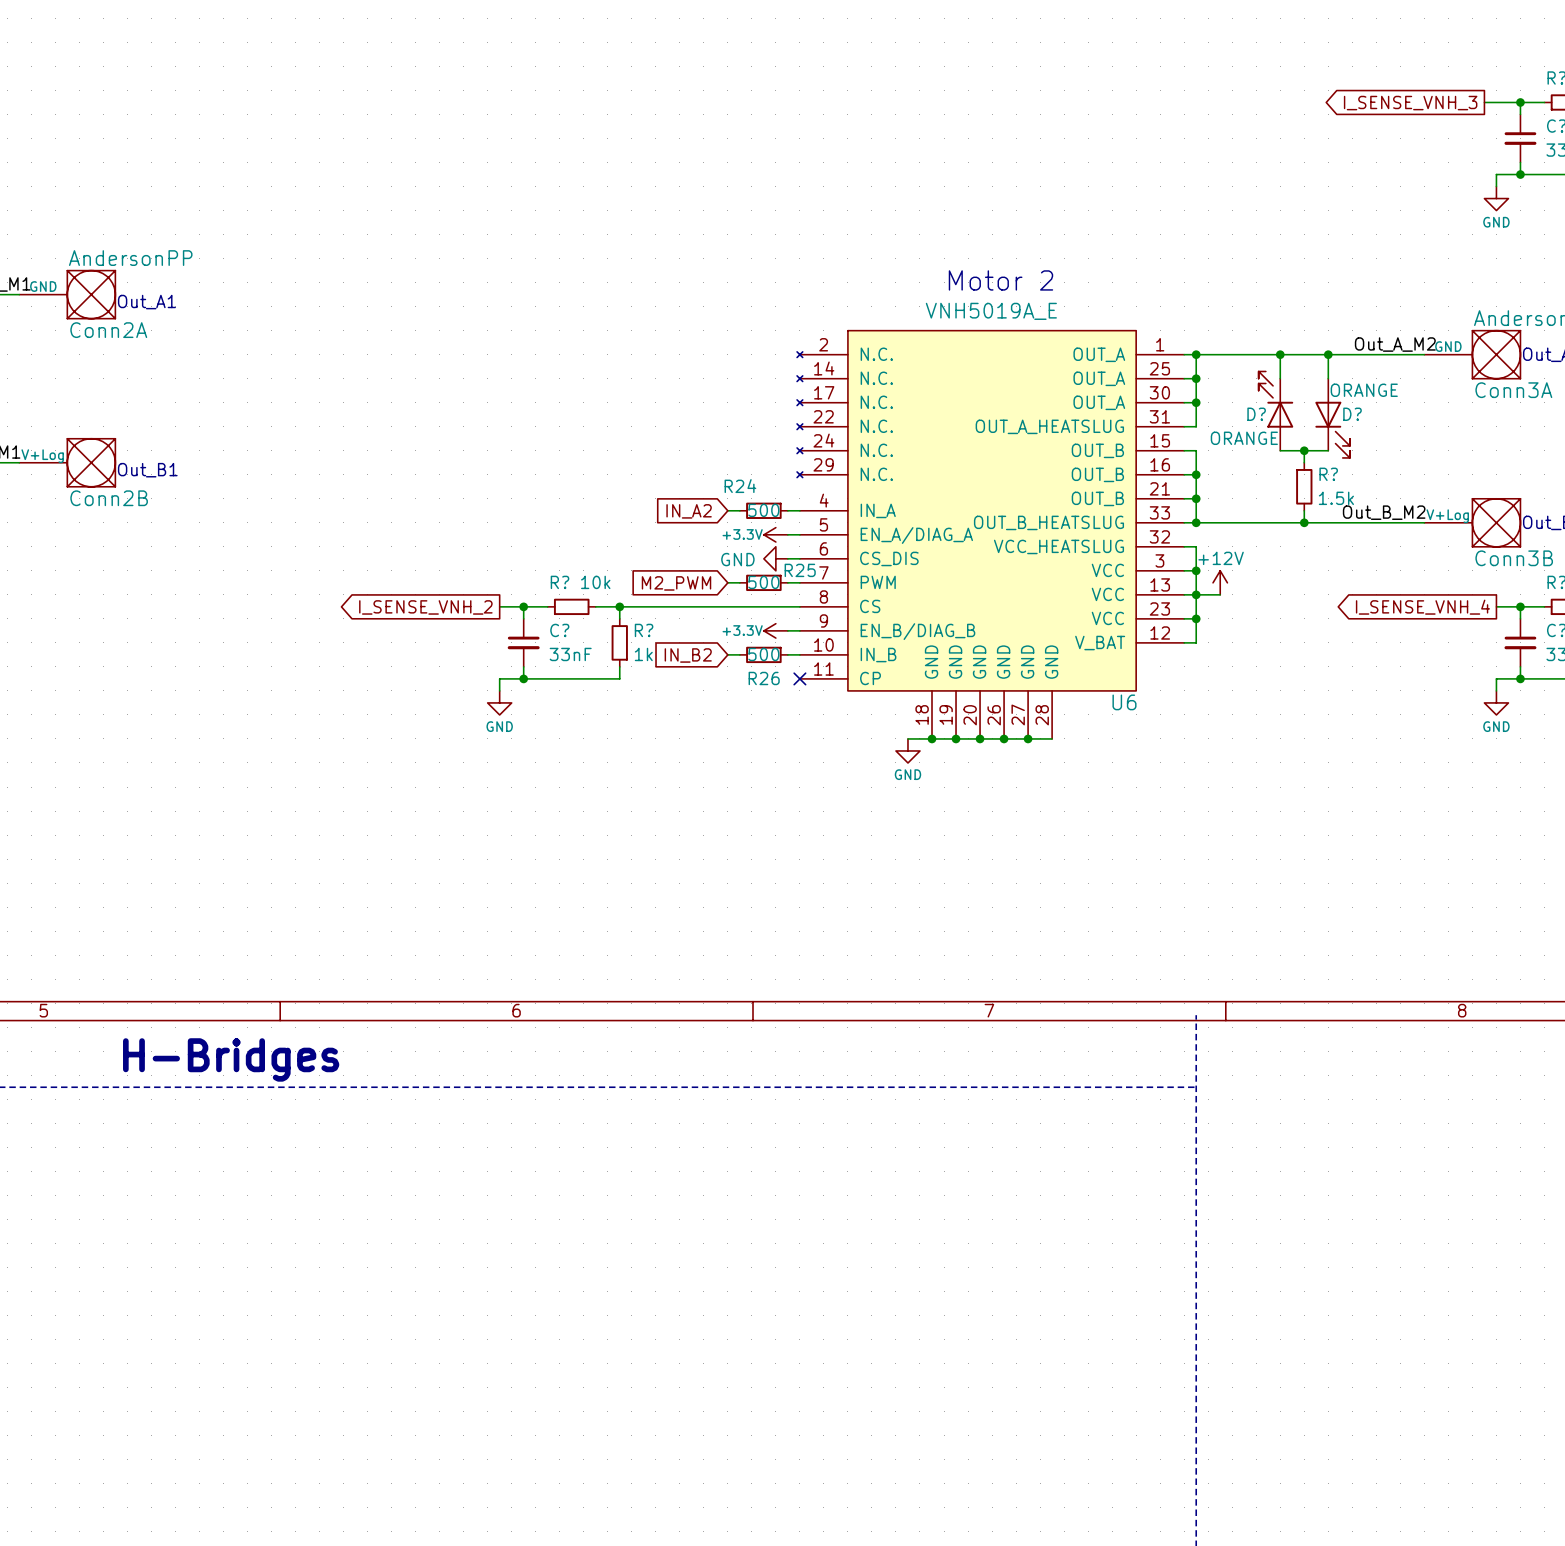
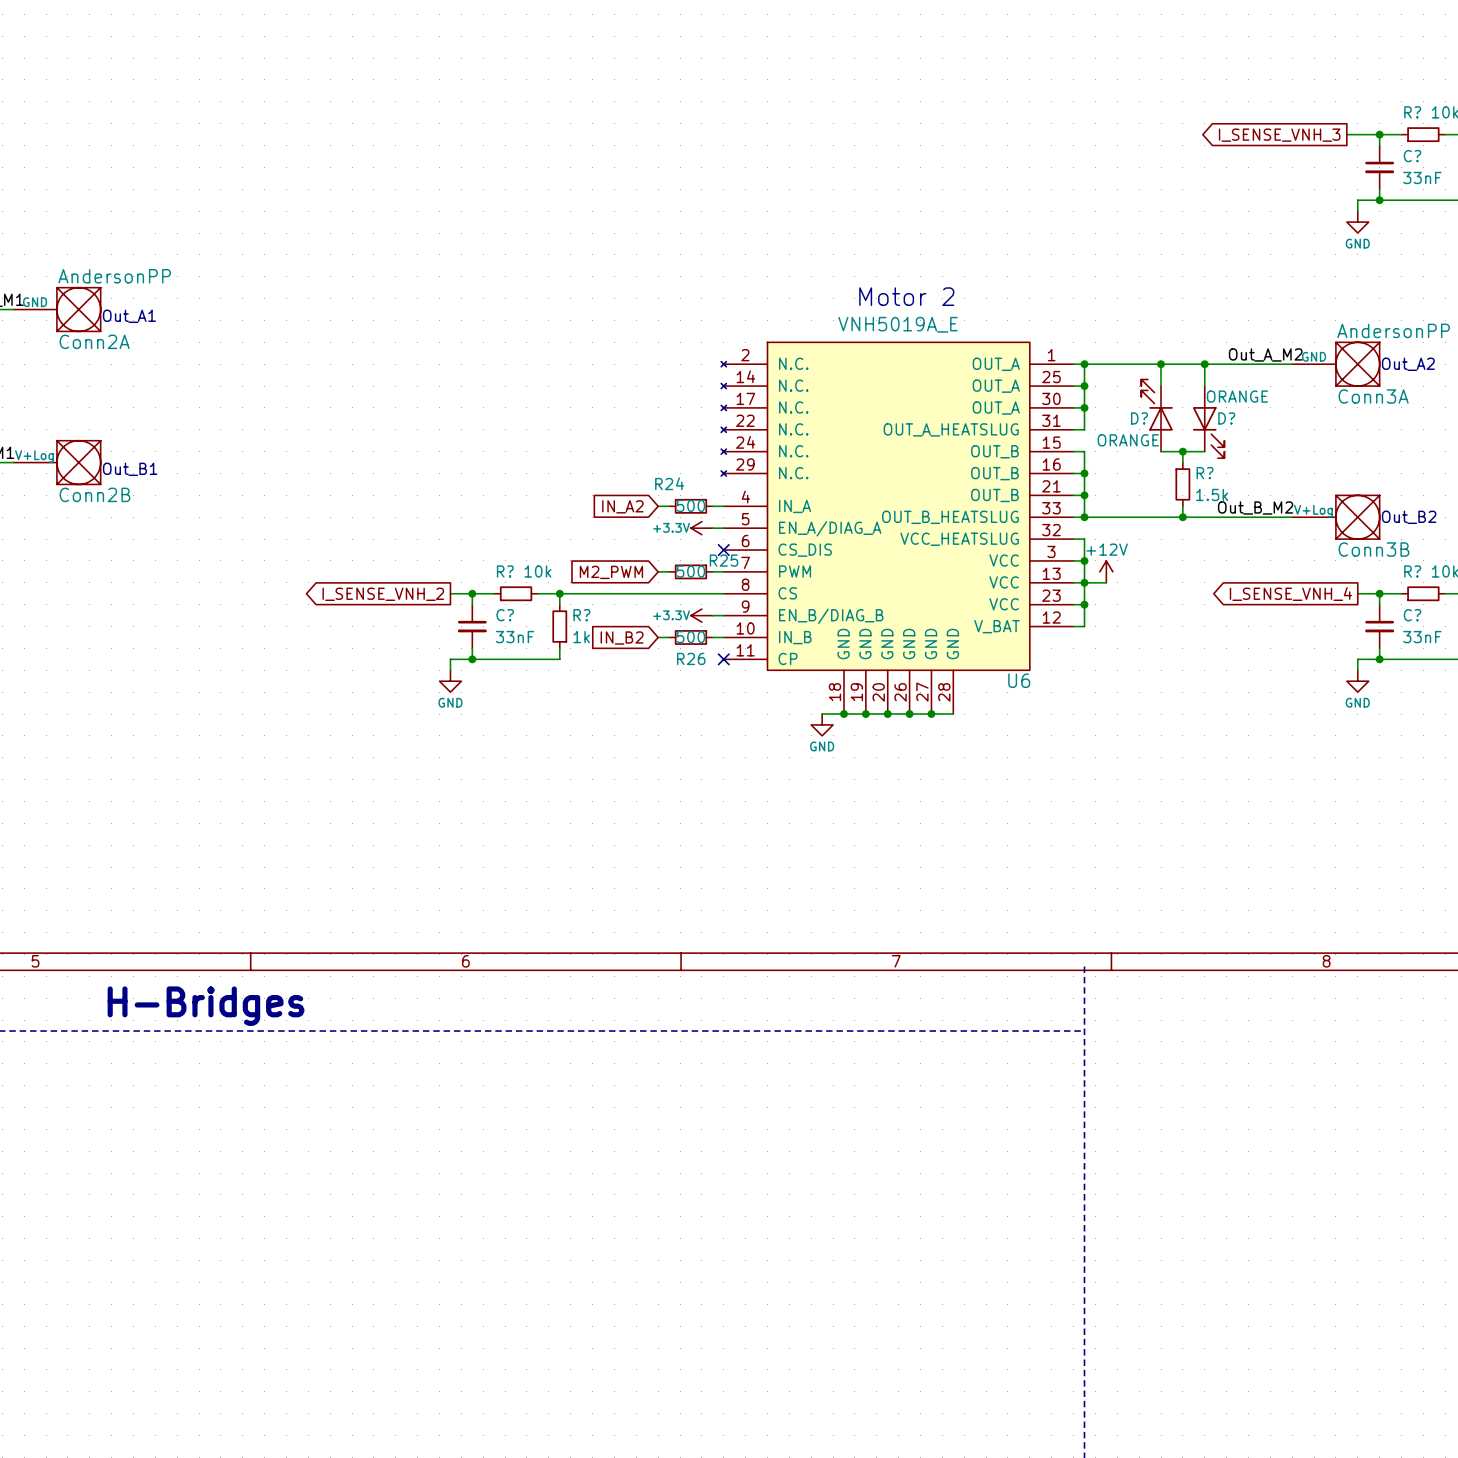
power symbol: GND (775, 558) -> none
wire: (787, 558) (799, 558) -> none
no-connect mark: none -> (723, 550)

